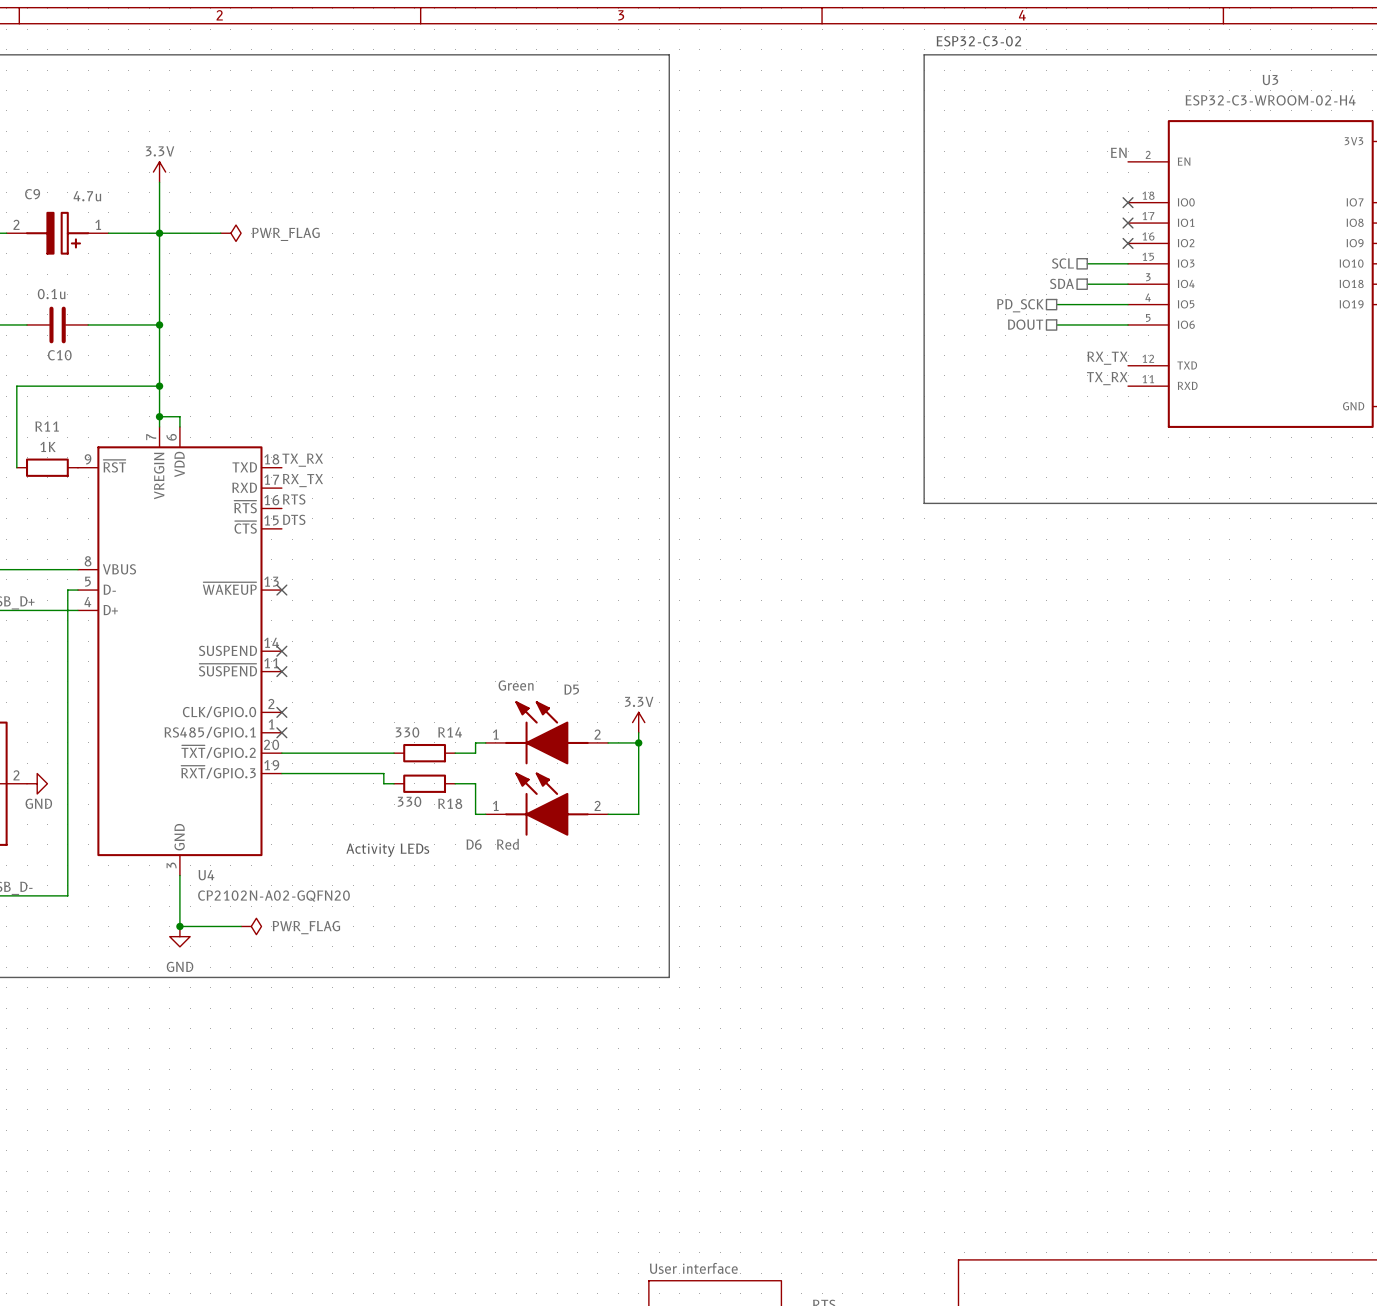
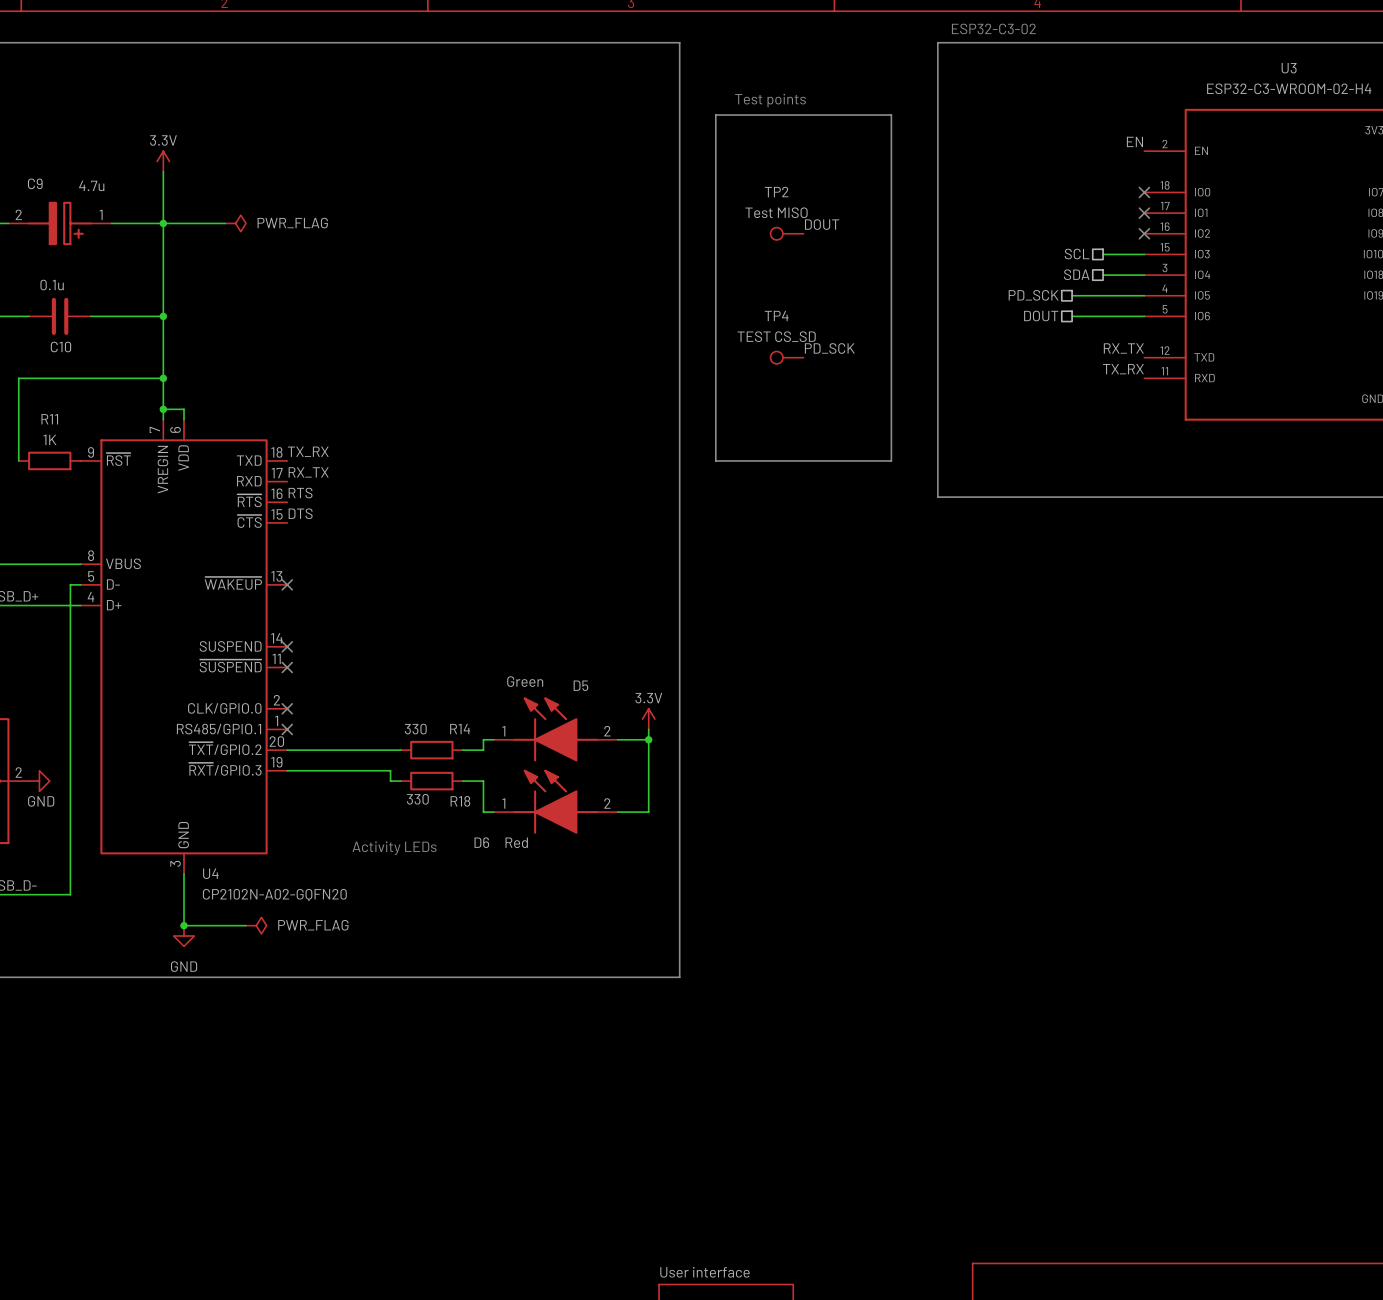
text: none -> Test points (770, 100)
line: none -> (715, 115) (891, 115) (891, 460) (715, 460) (715, 115)
label: none -> DOUT (822, 224)
TP2: none -> Test MISO (787, 233)
label: none -> PD_SCK (829, 348)
TP4: none -> TEST CS_SD (787, 357)

